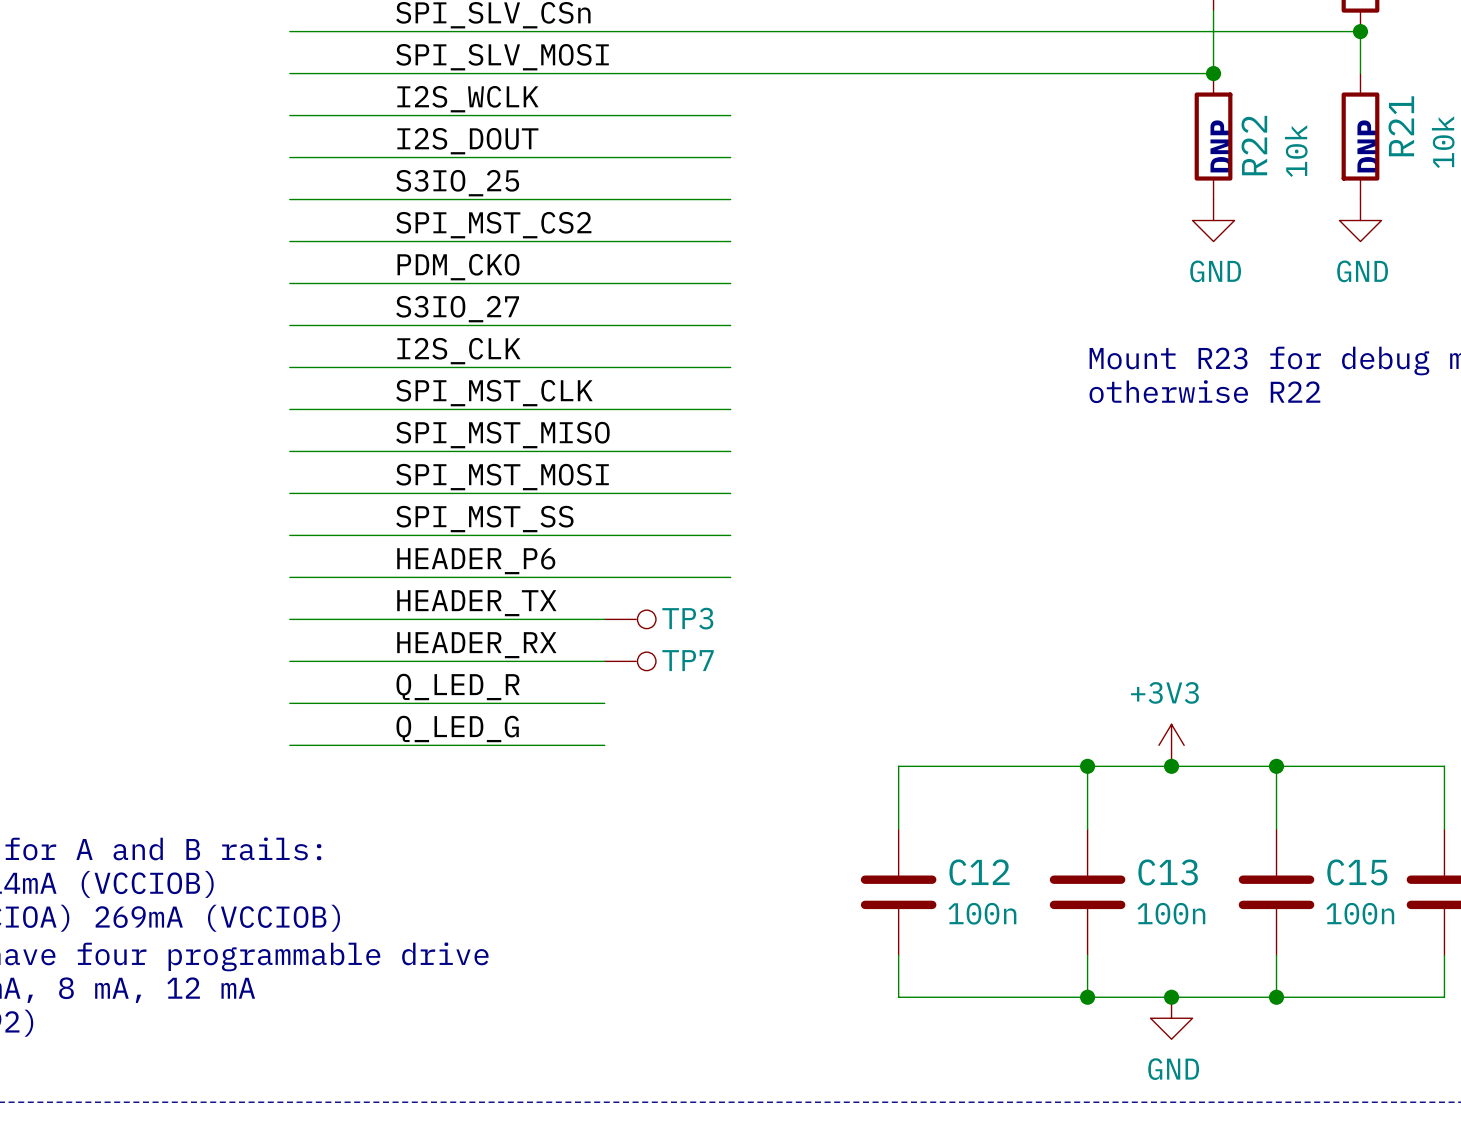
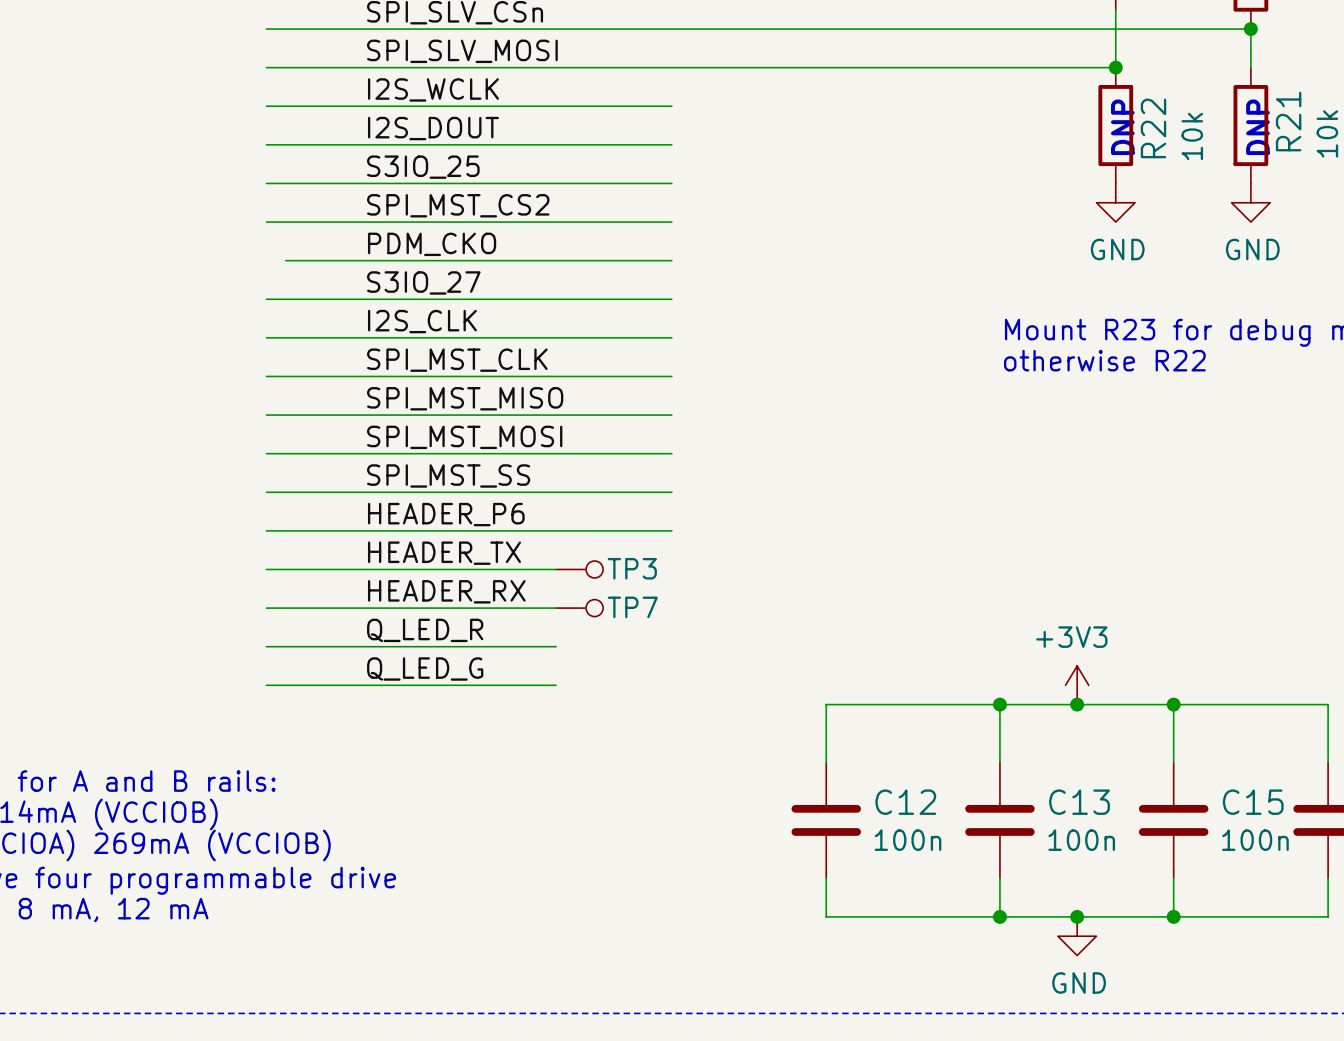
wire: (289, 283) (310, 283) -> none

